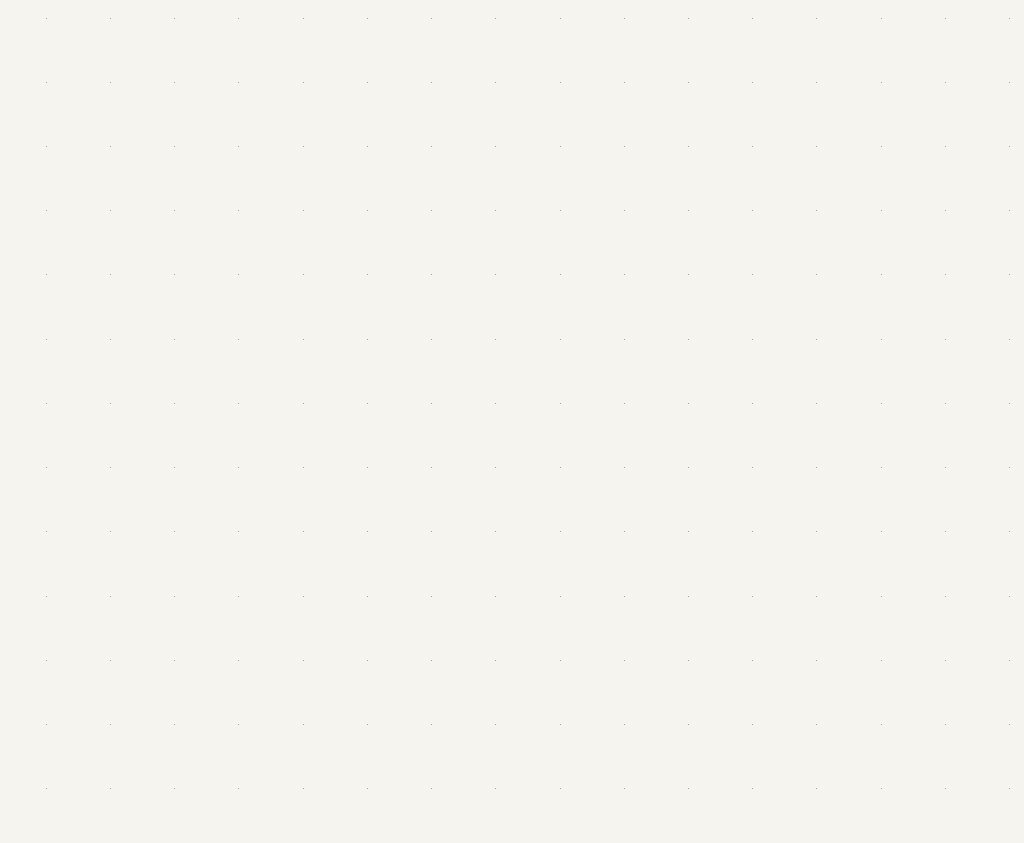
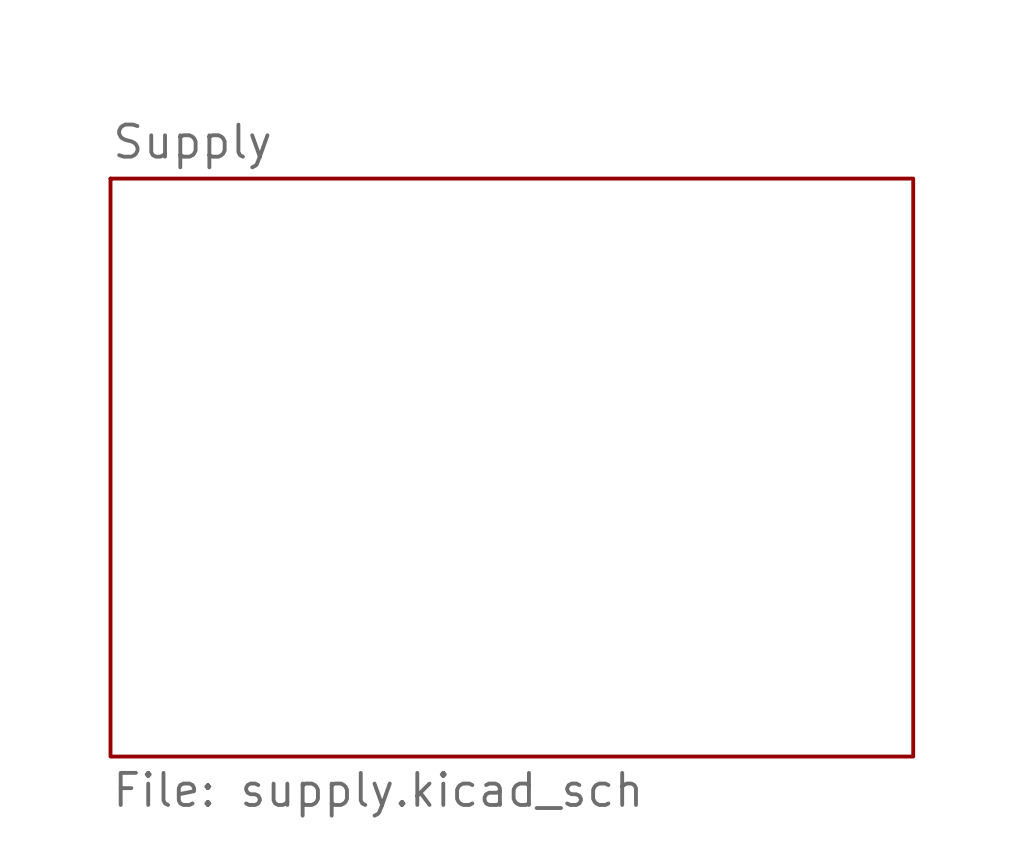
sheet Supply: none -> File: supply.kicad_sch (511, 467)

